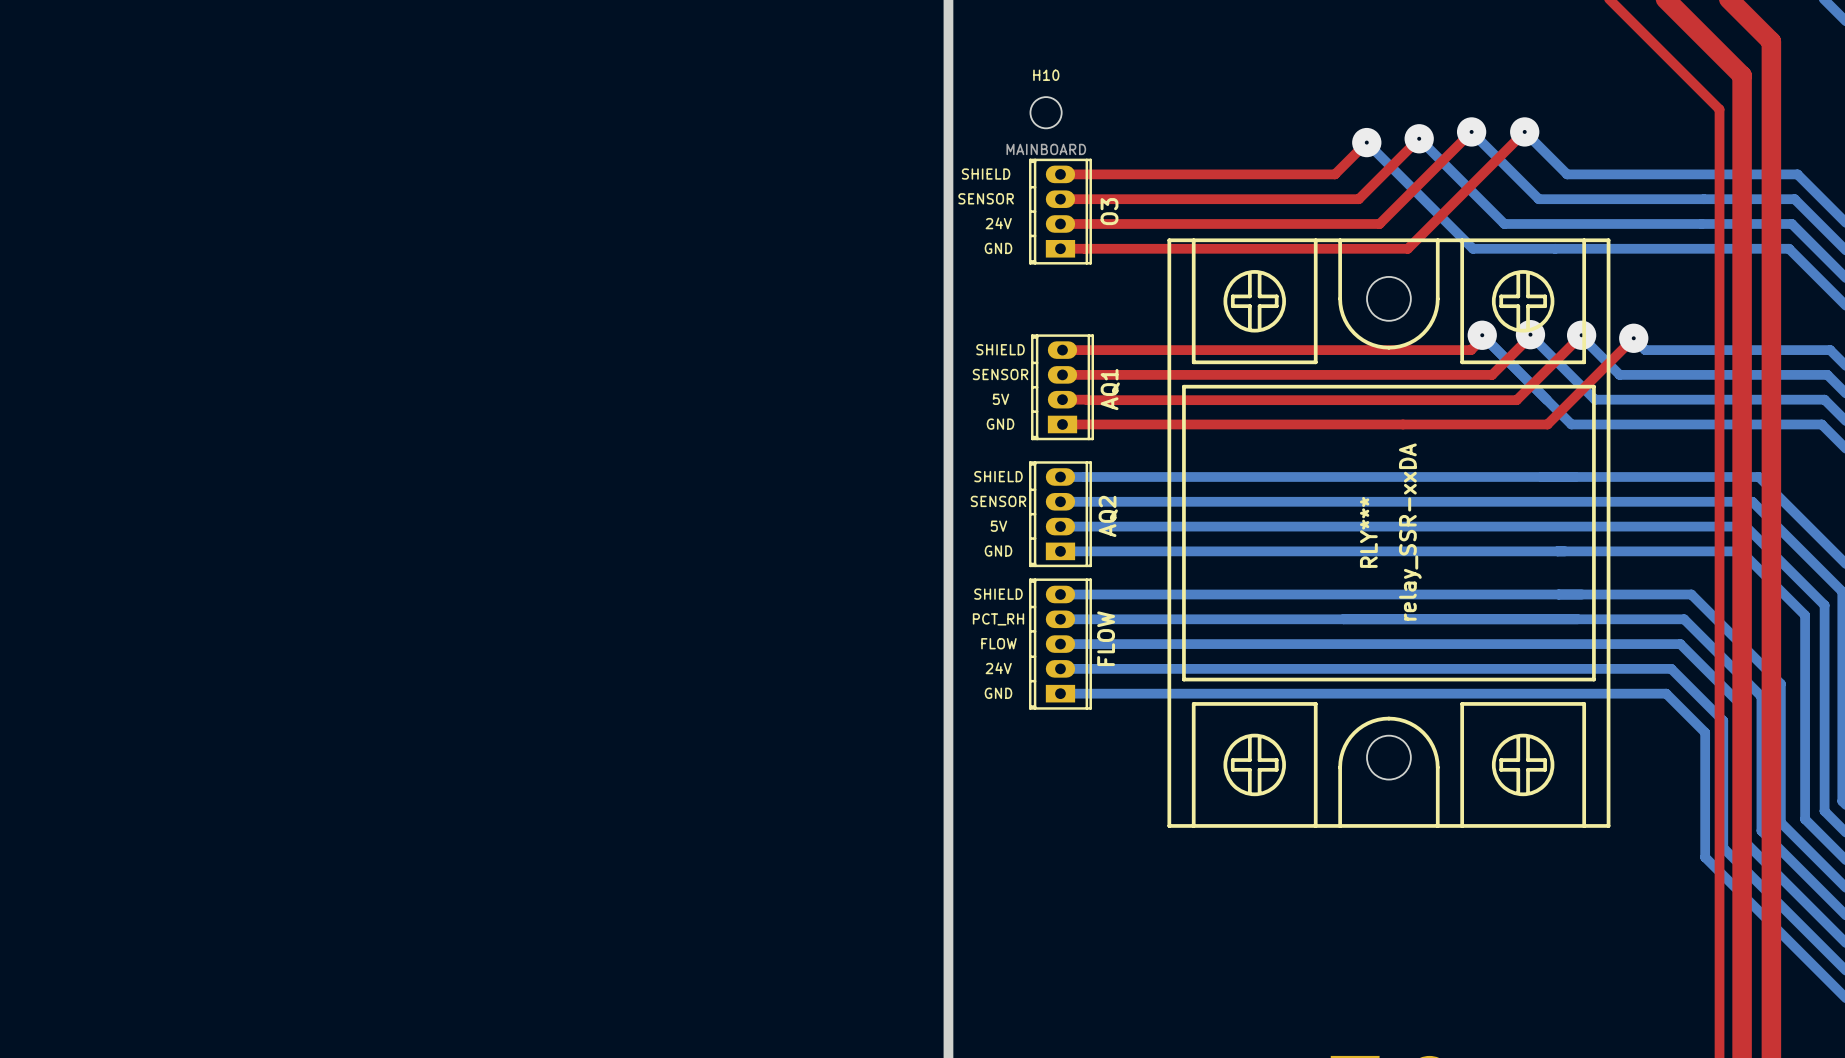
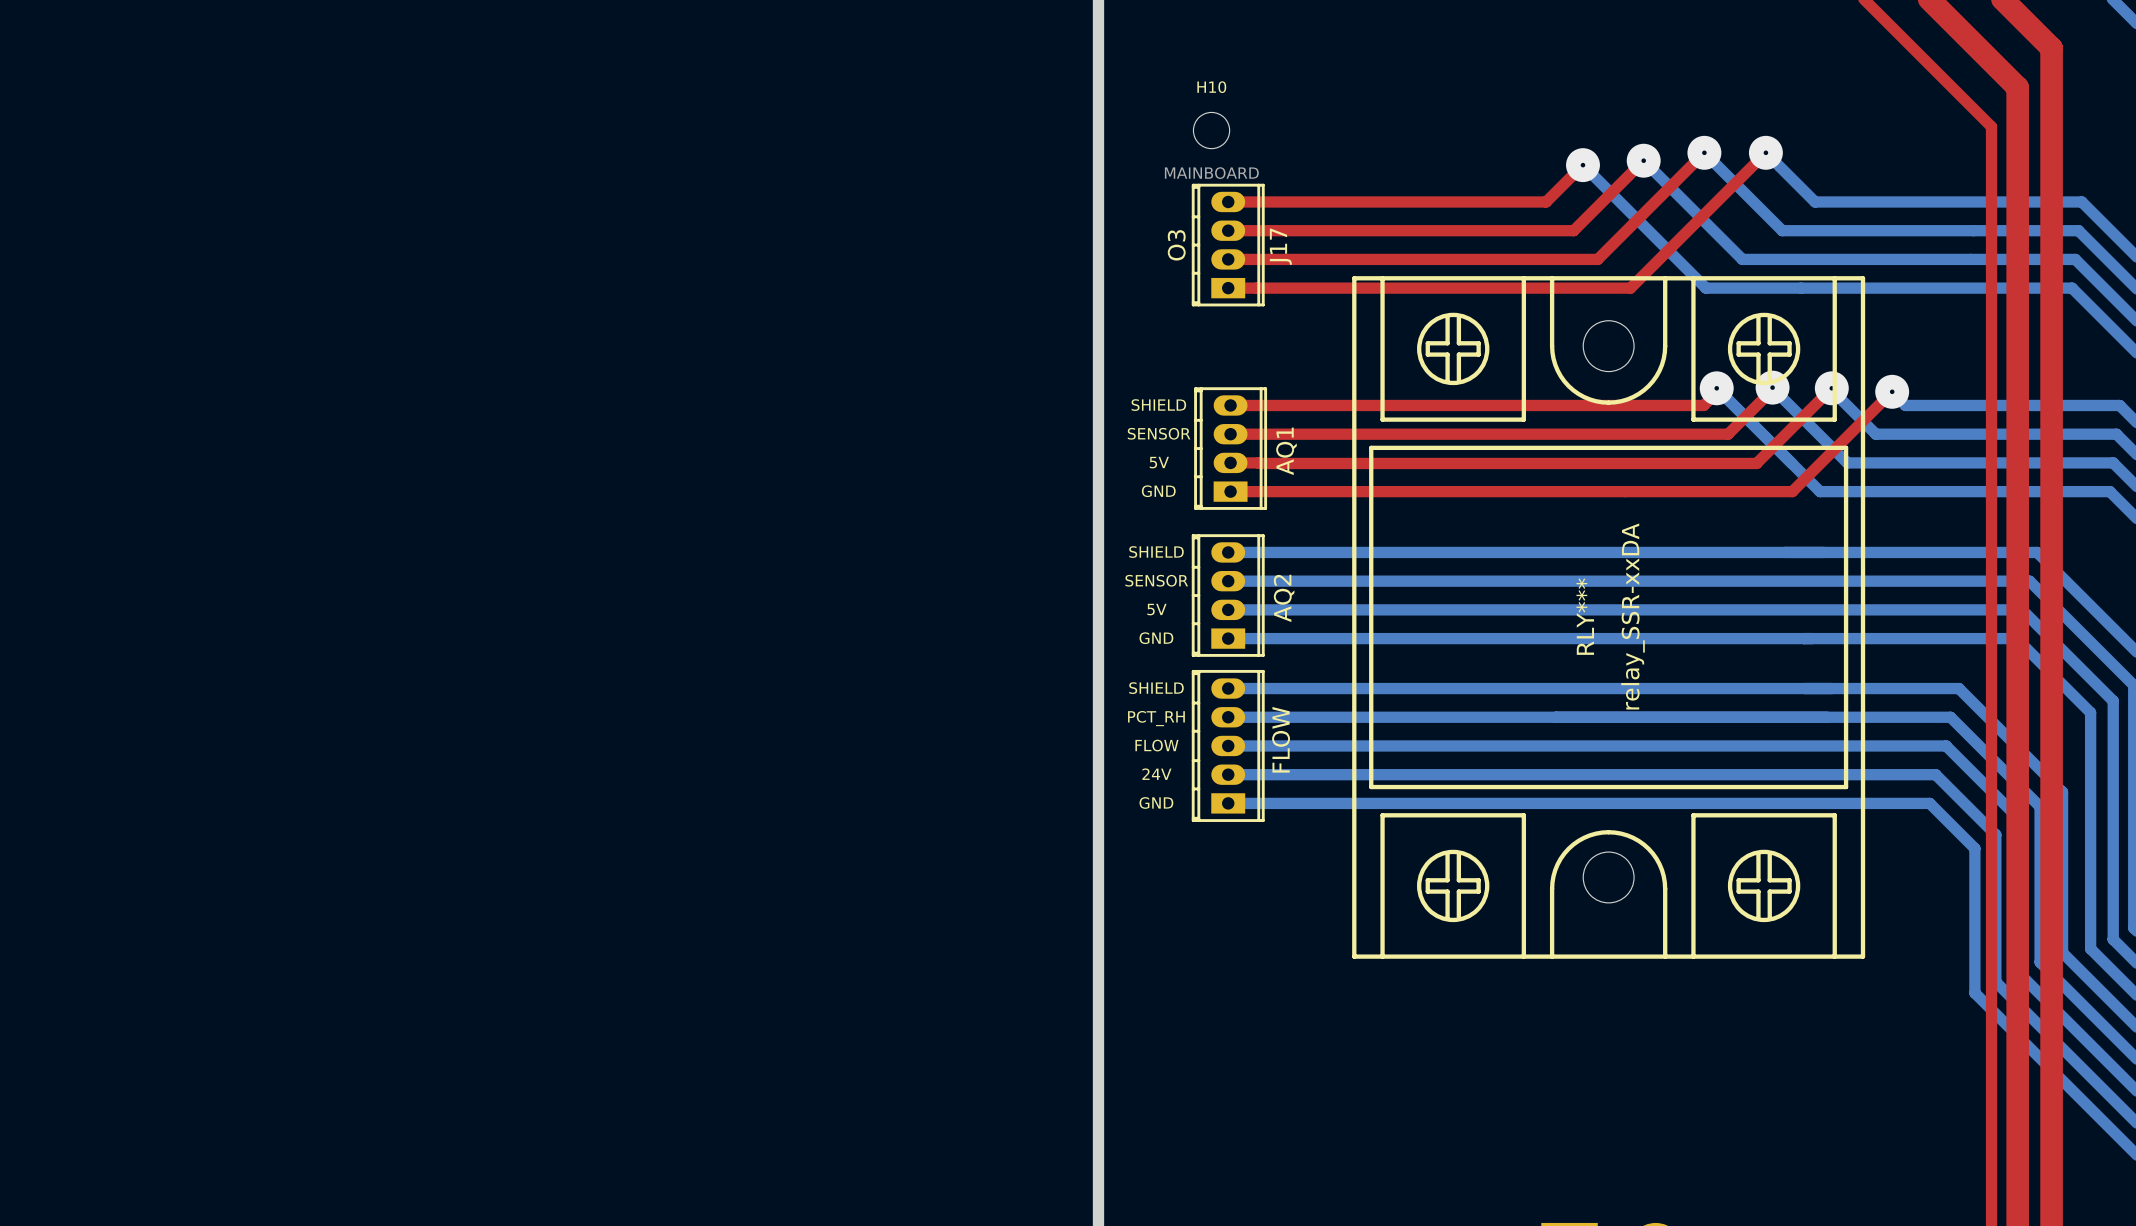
J17 text: SHIELD (986, 174) -> none
J17 text: SENSOR (986, 198) -> none
J17 name: none -> J17 (1280, 246)
J17 value position: O3 (1109, 211) -> O3 (1176, 245)
J17 text: 24V (998, 223) -> none
J17 text: GND (998, 248) -> none

